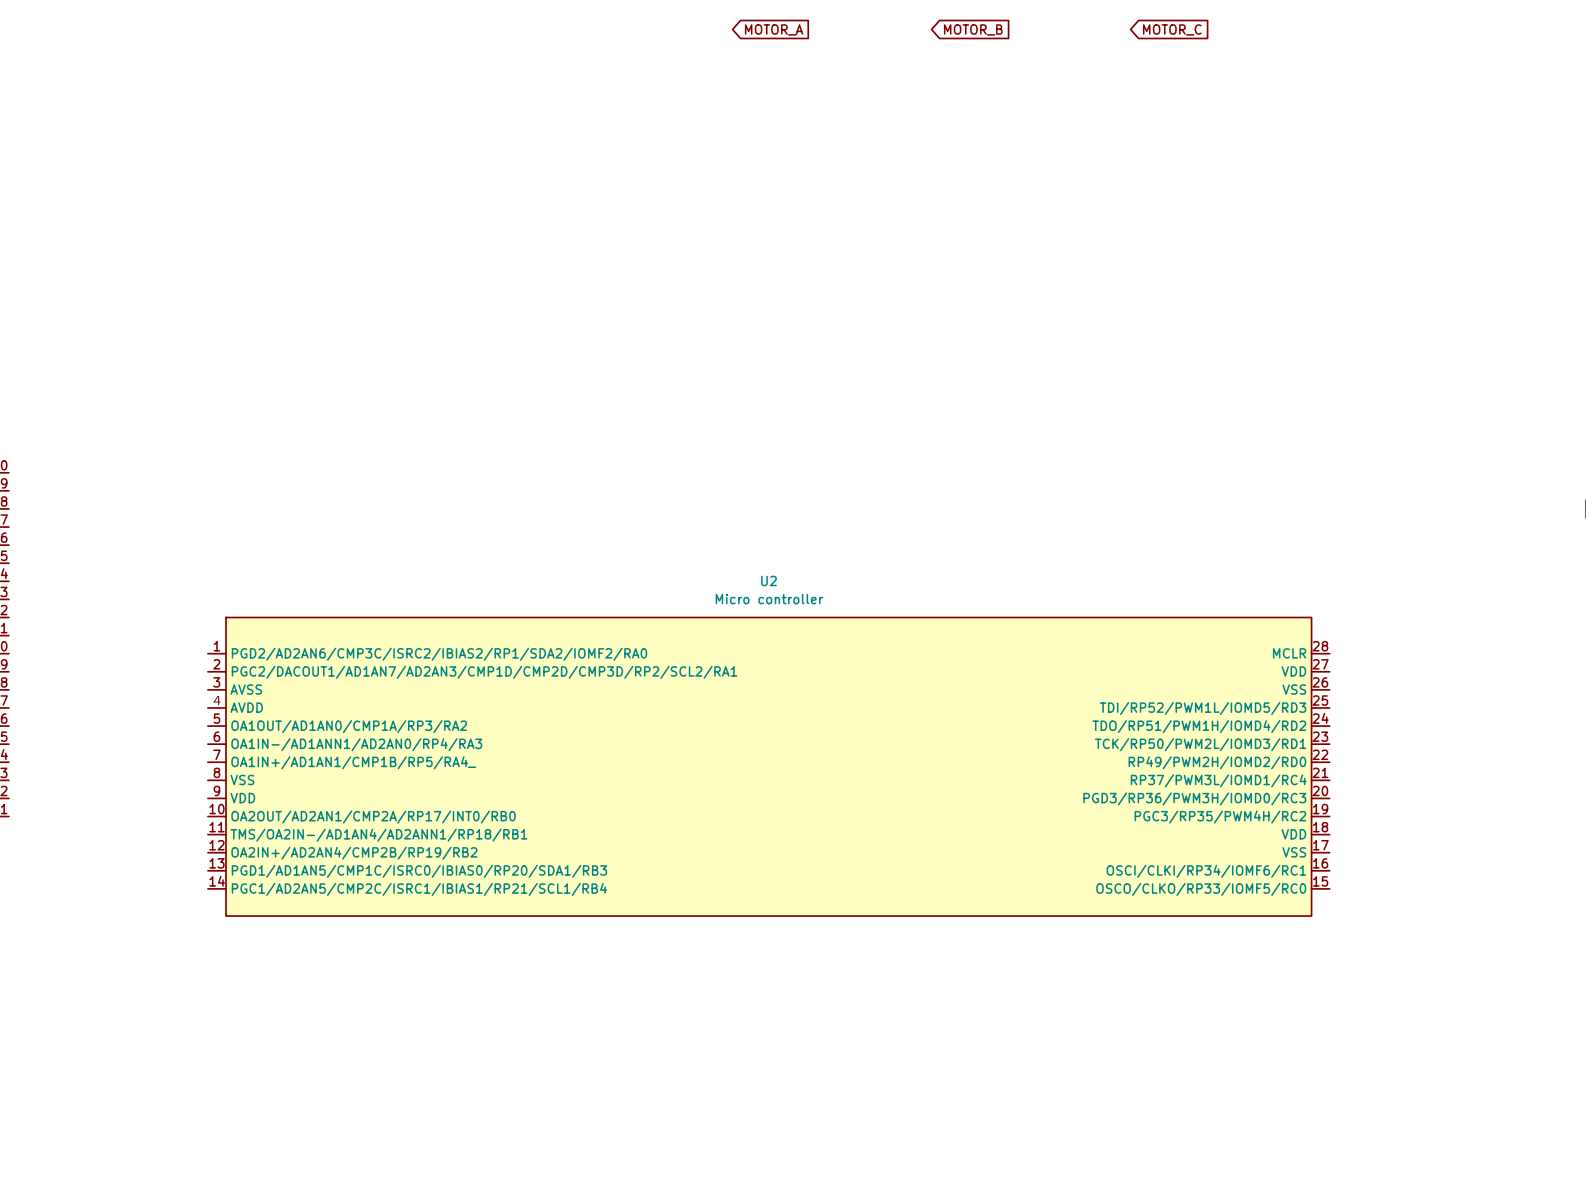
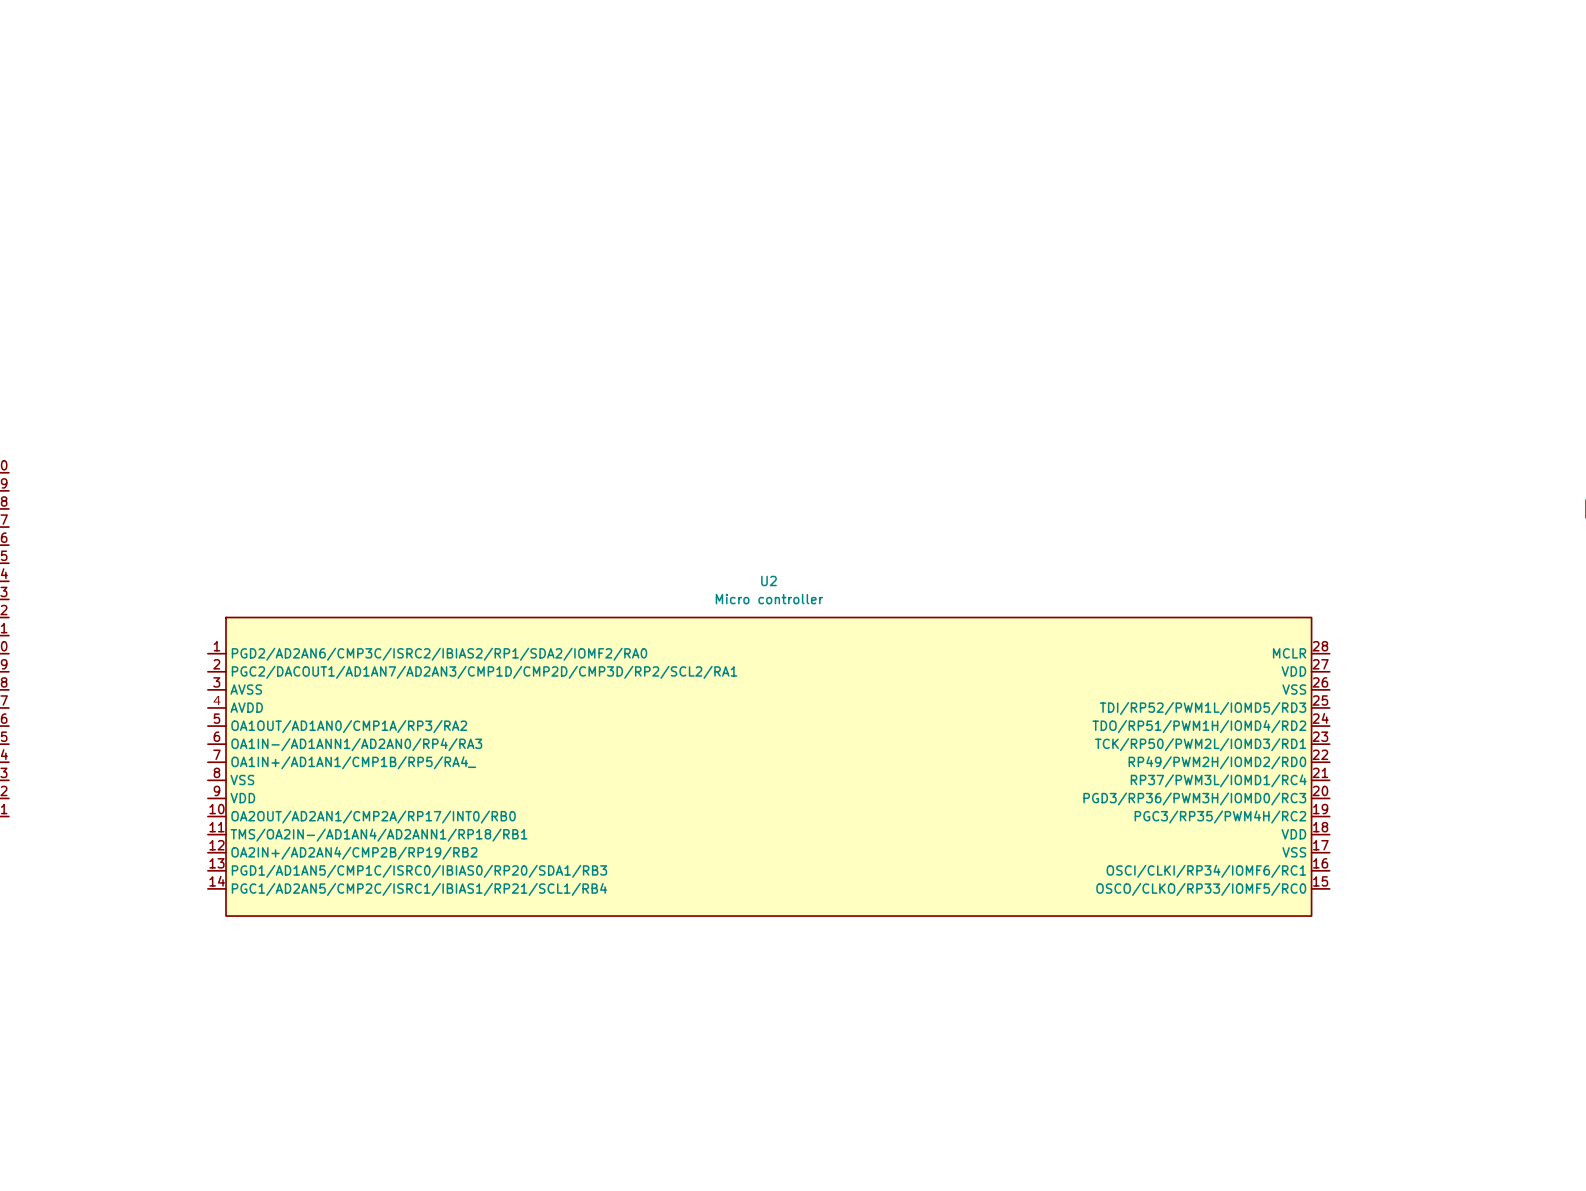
global label: MOTOR_A (774, 29) -> none
global label: MOTOR_B (973, 29) -> none
global label: MOTOR_C (1172, 29) -> none

